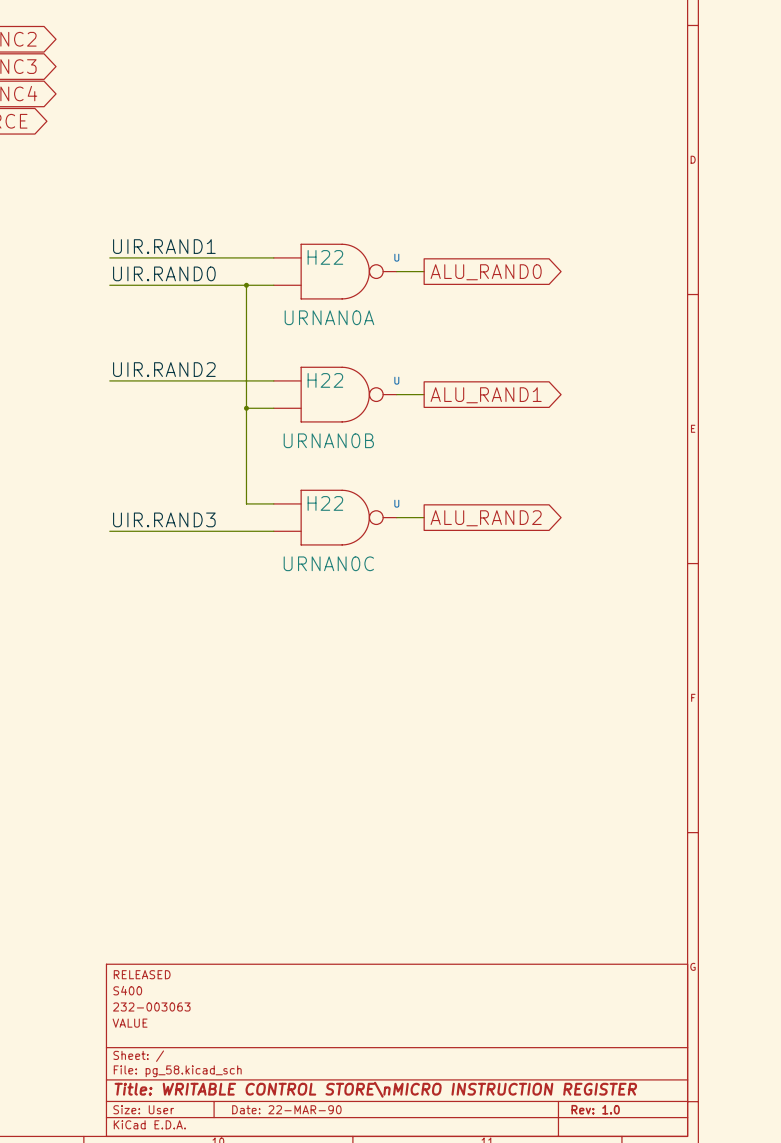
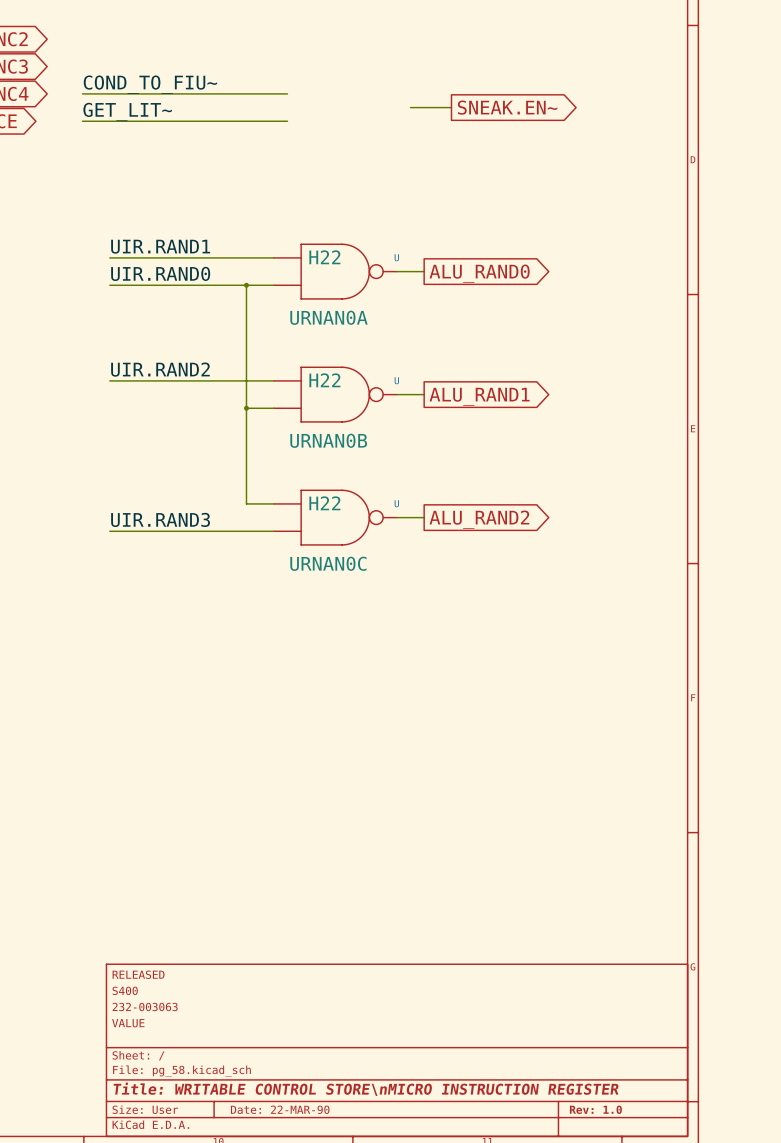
label: none -> COND_TO_FIU~ (150, 84)
wire: none -> (82, 93) (287, 93)
wire: none -> (410, 107) (451, 107)
global label: none -> SNEAK.EN~ (507, 107)
label: none -> GET_LIT~ (127, 111)
wire: none -> (82, 121) (287, 121)

